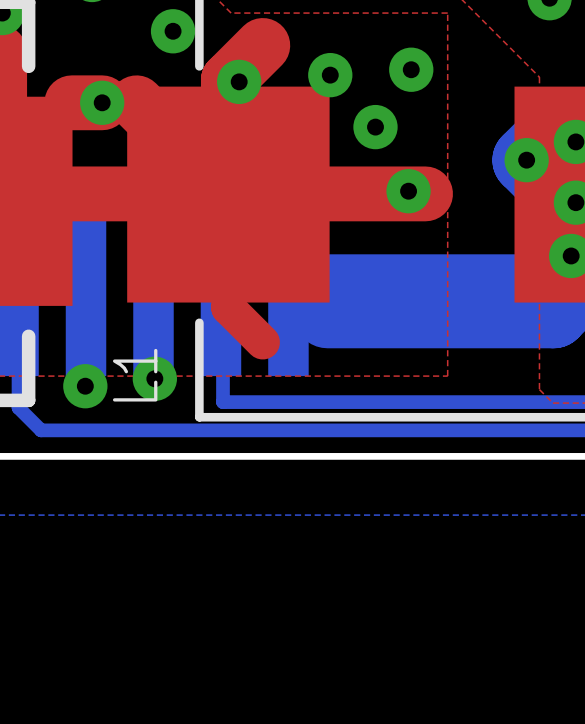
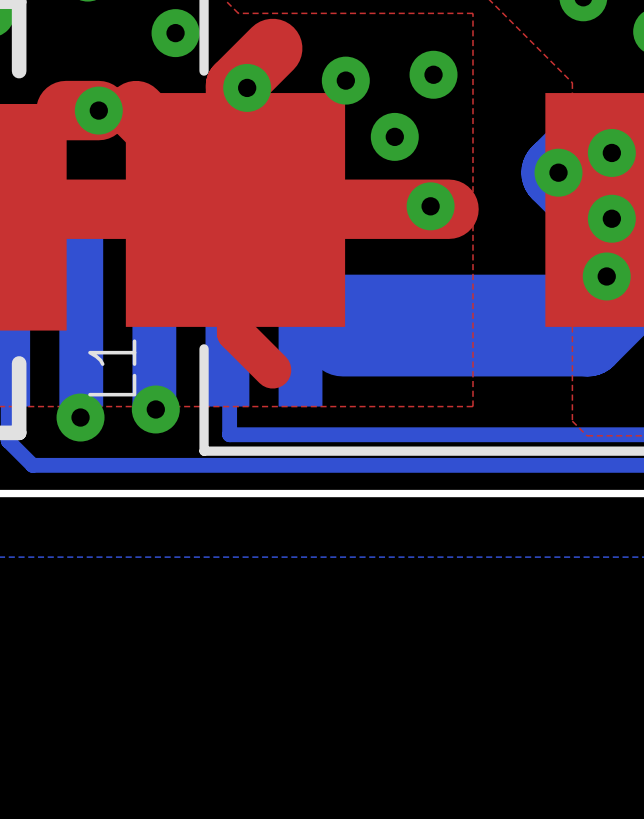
L1 name position: L1 (135, 375) -> L1 (112, 367)

